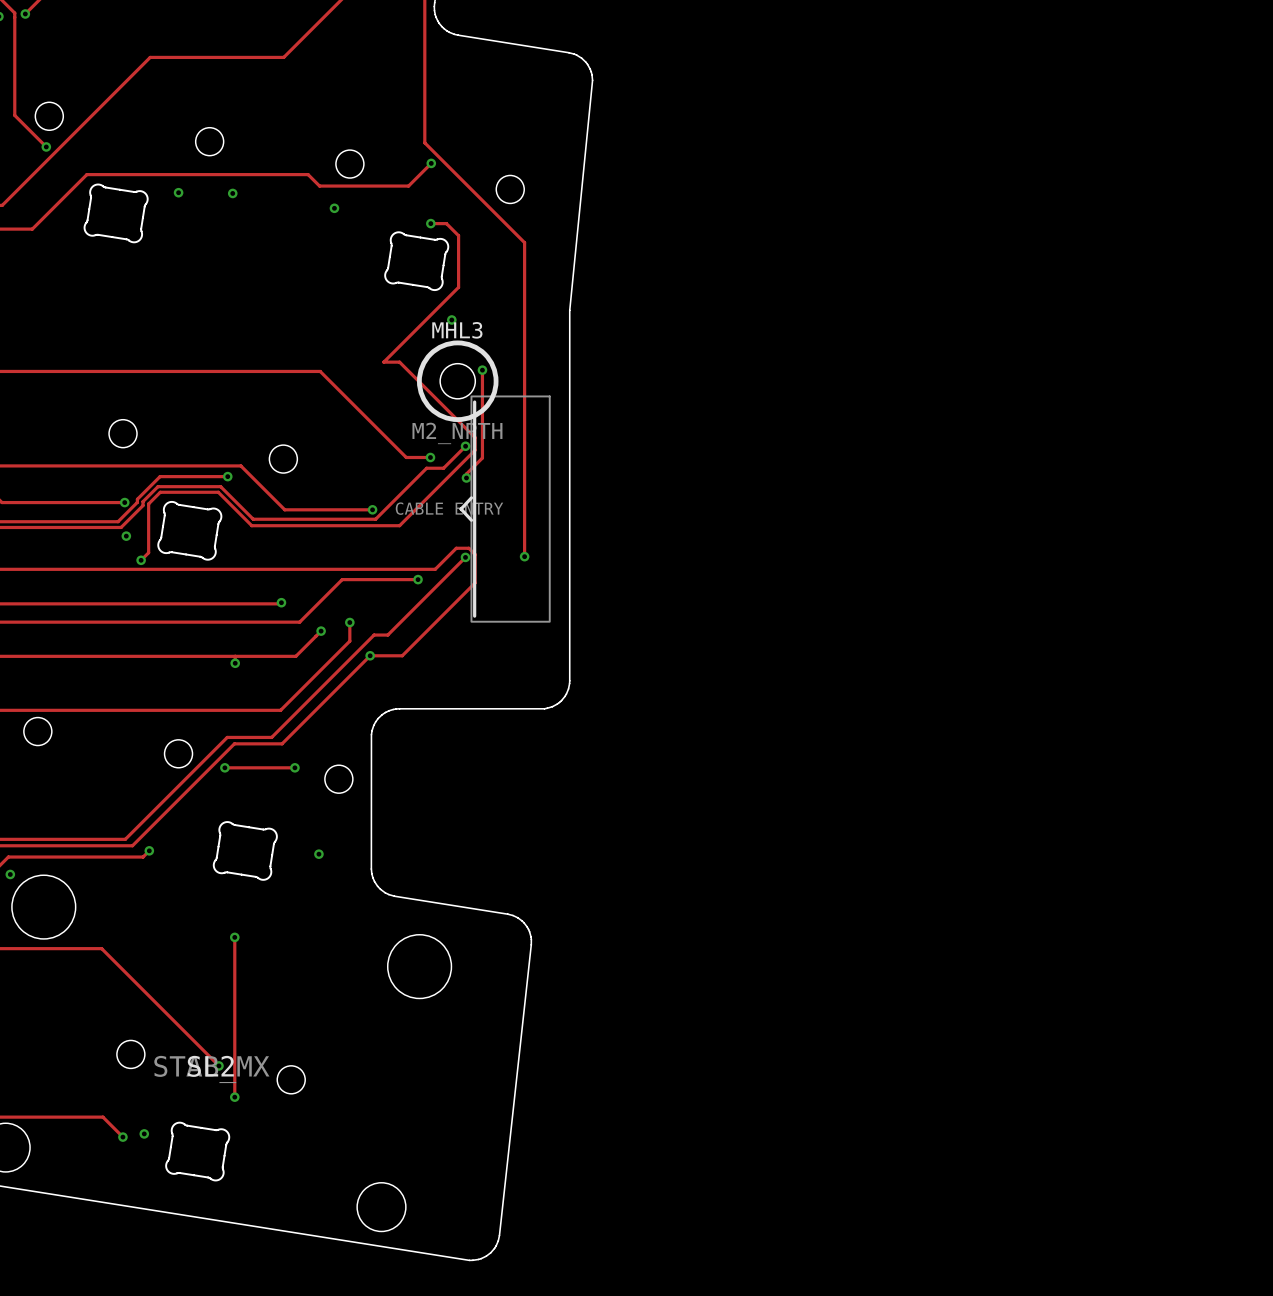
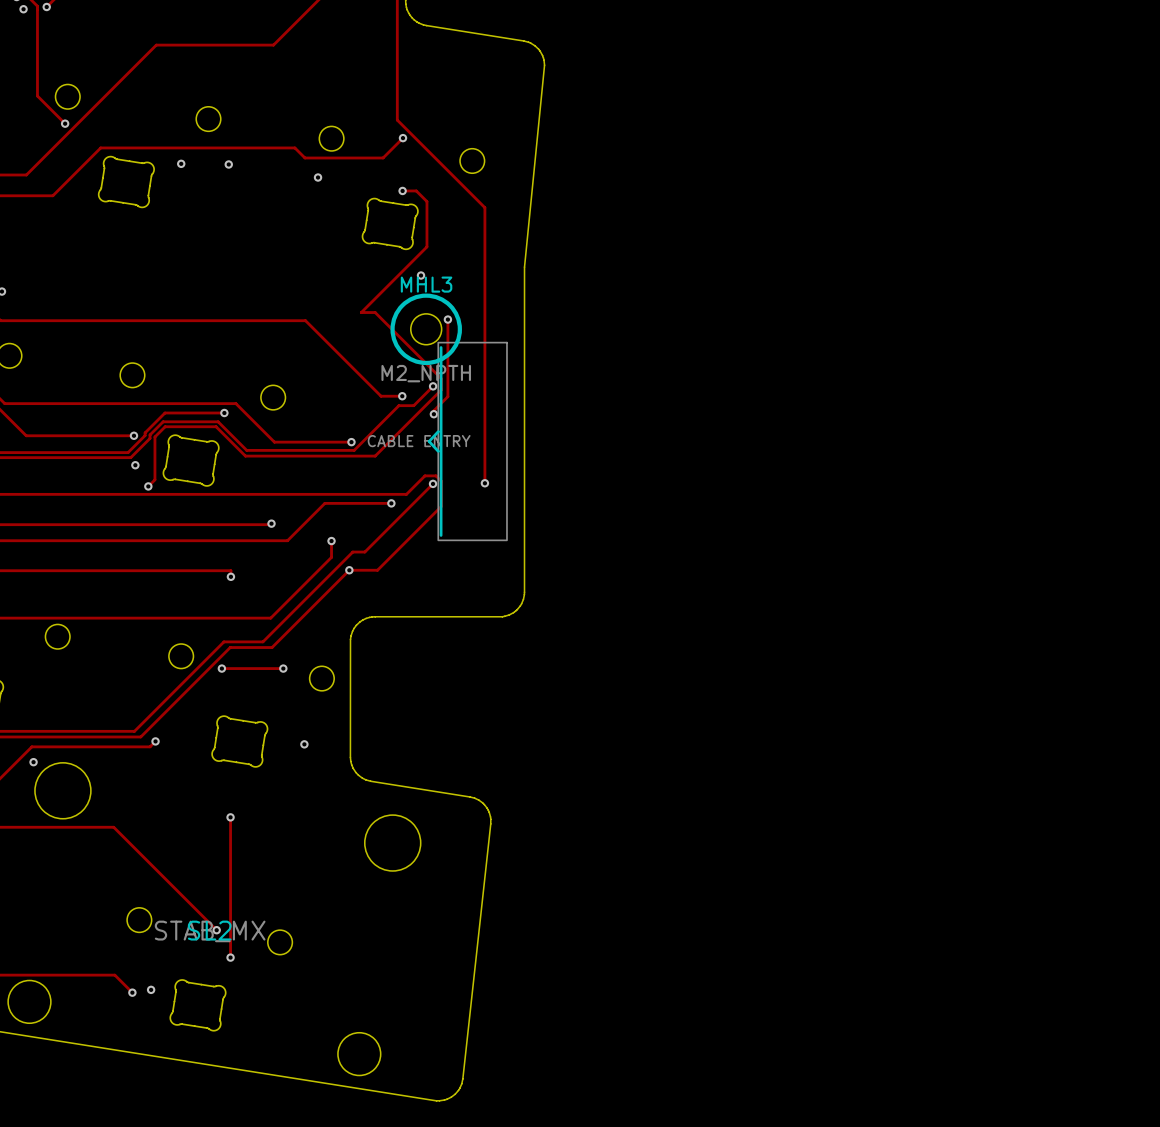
track: (321, 631) (295, 656) (235, 656) -> none
via: (321, 631) -> none

